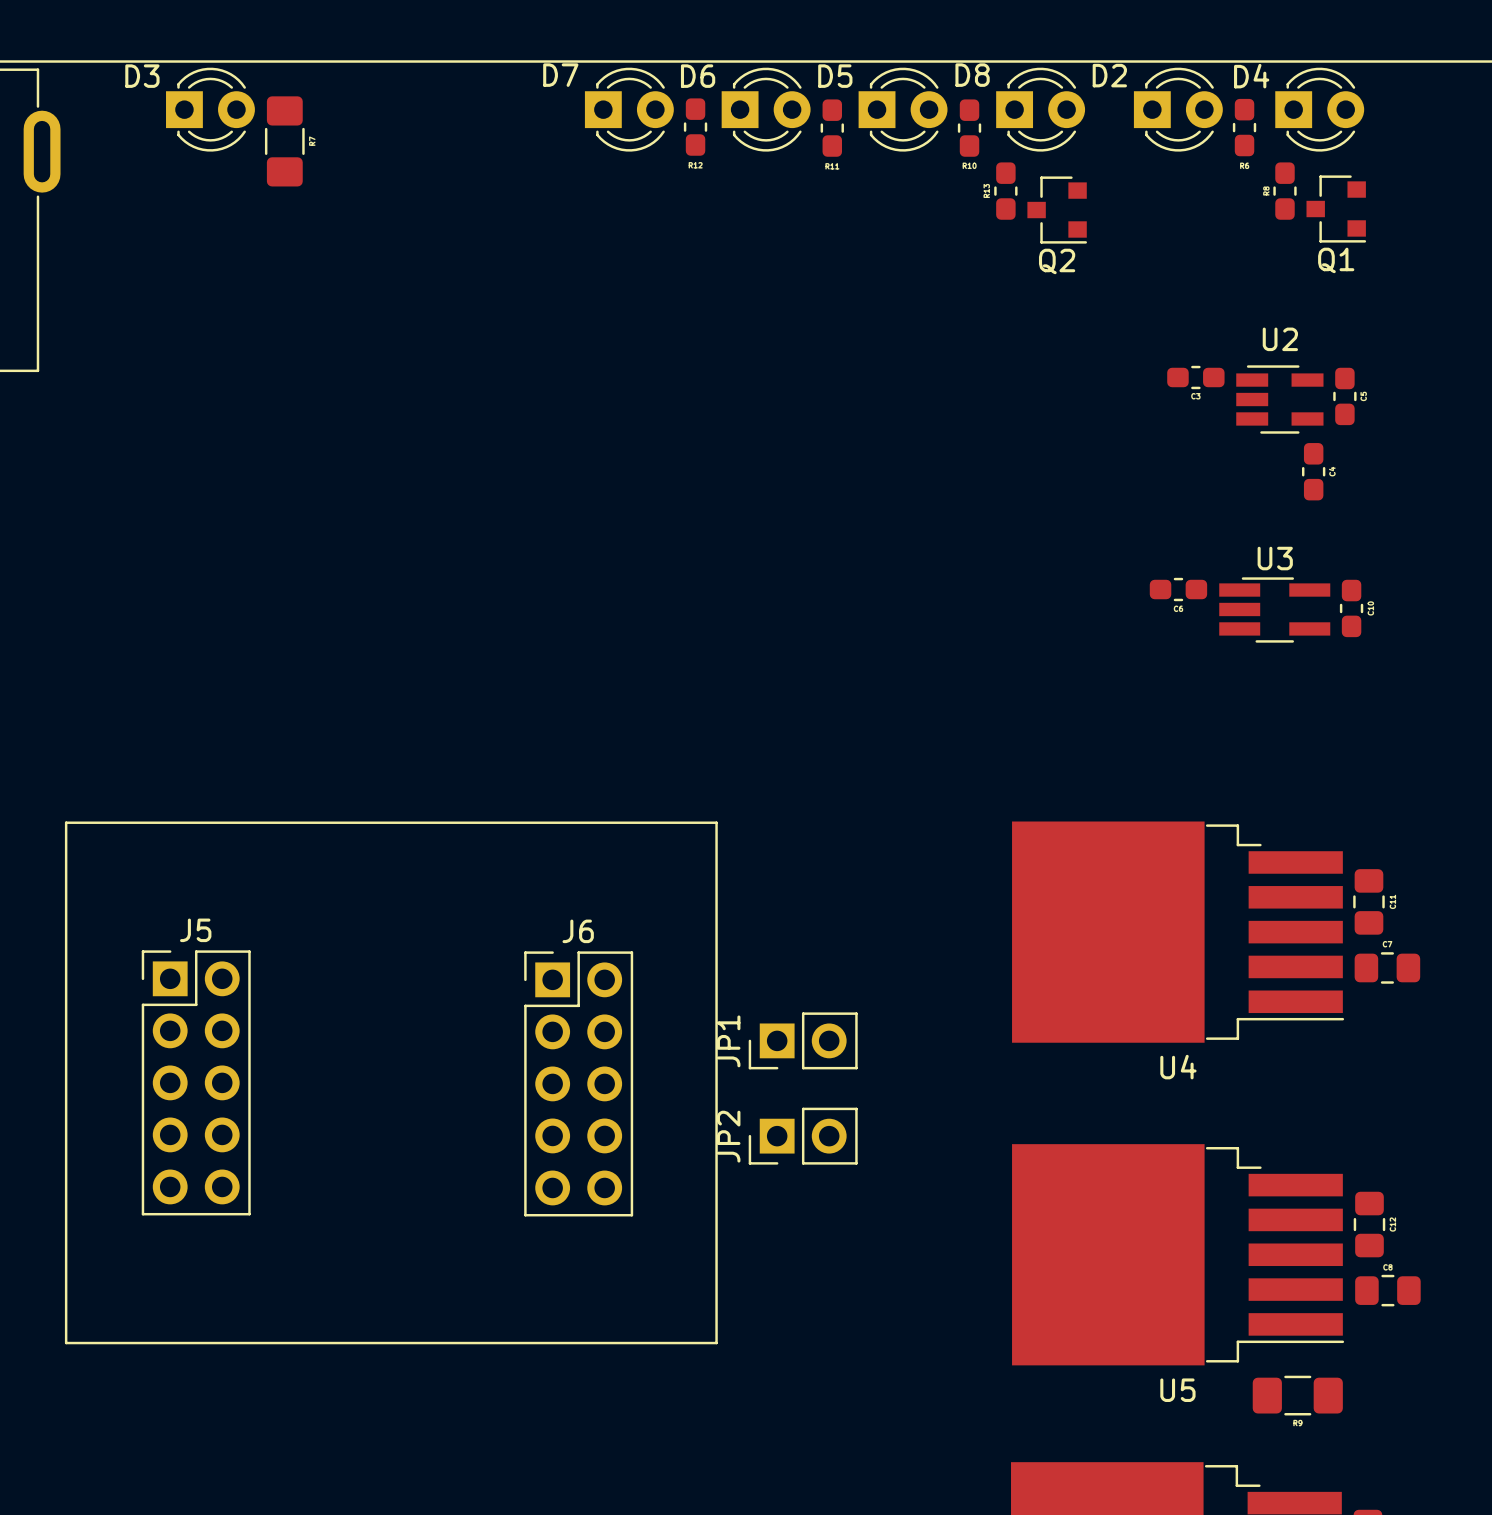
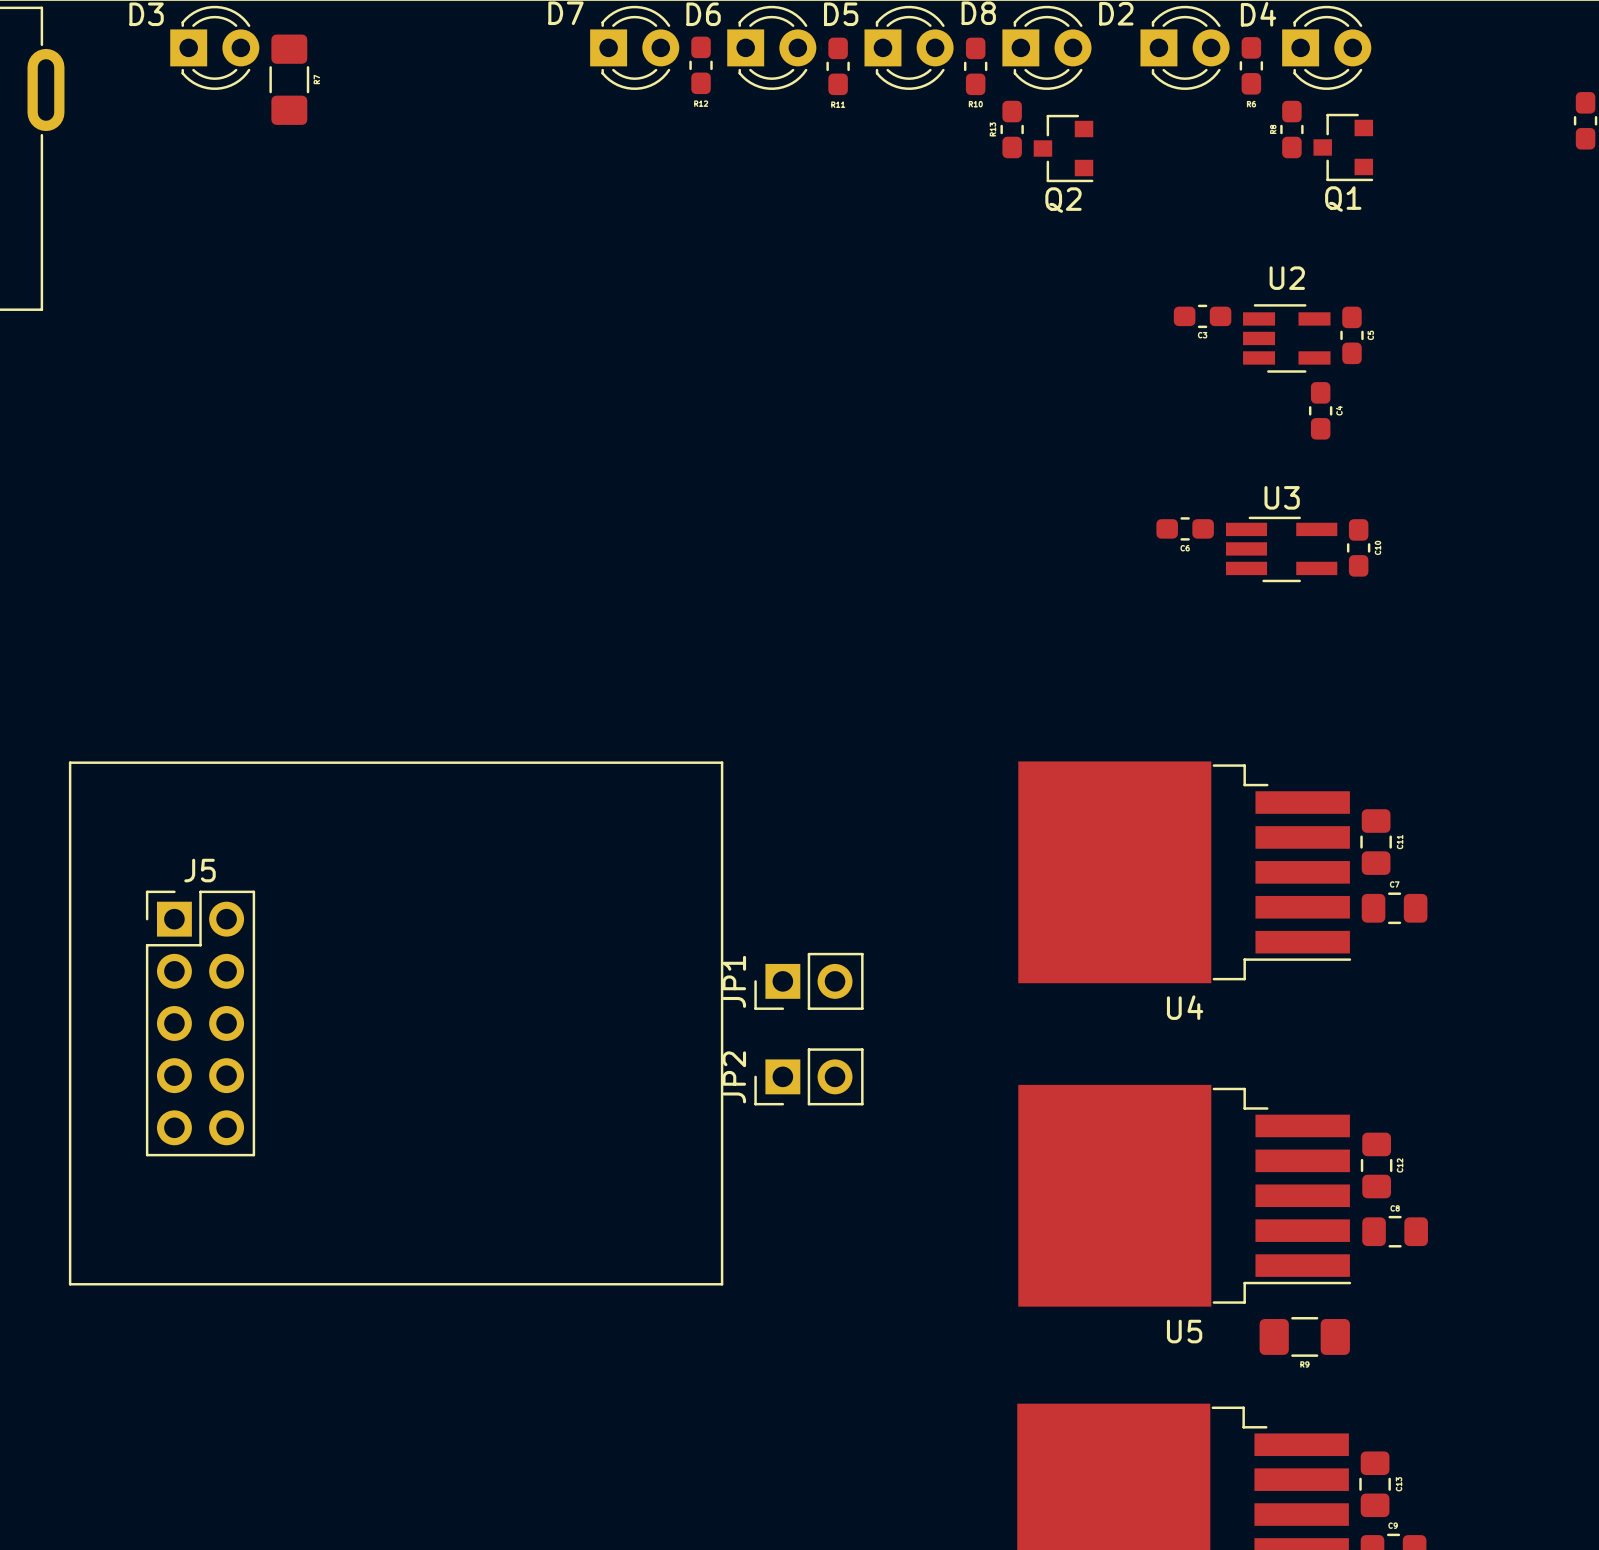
J6: (578, 1083) -> none

